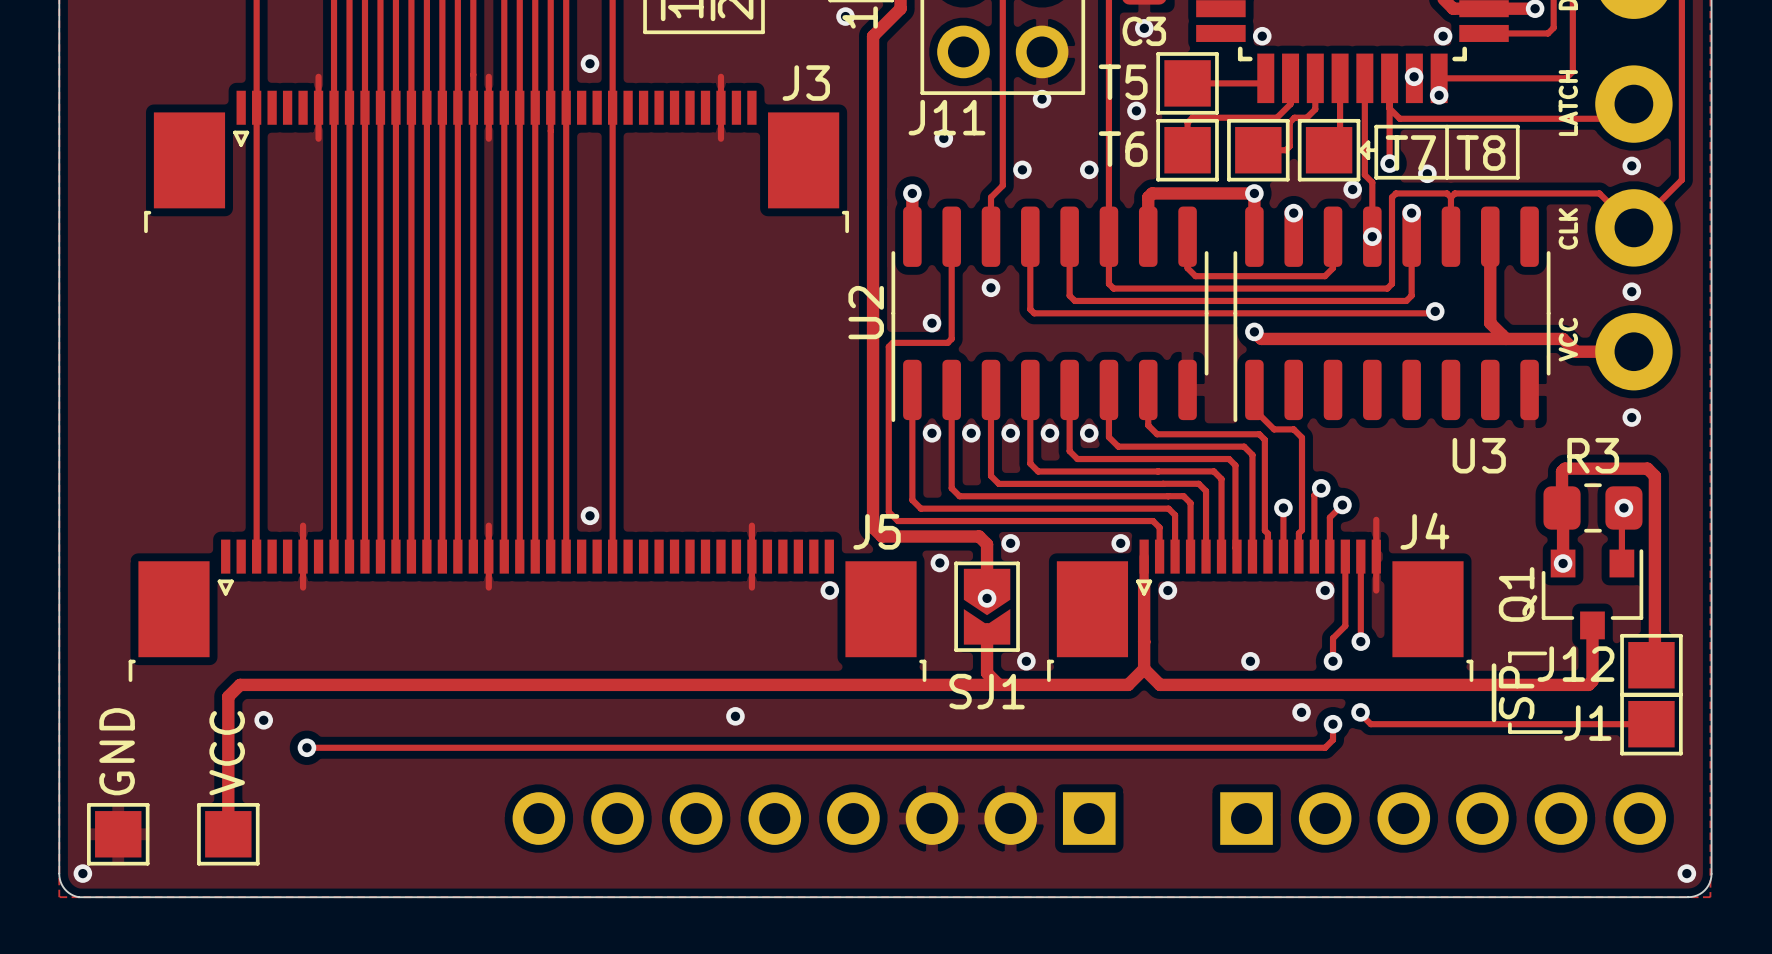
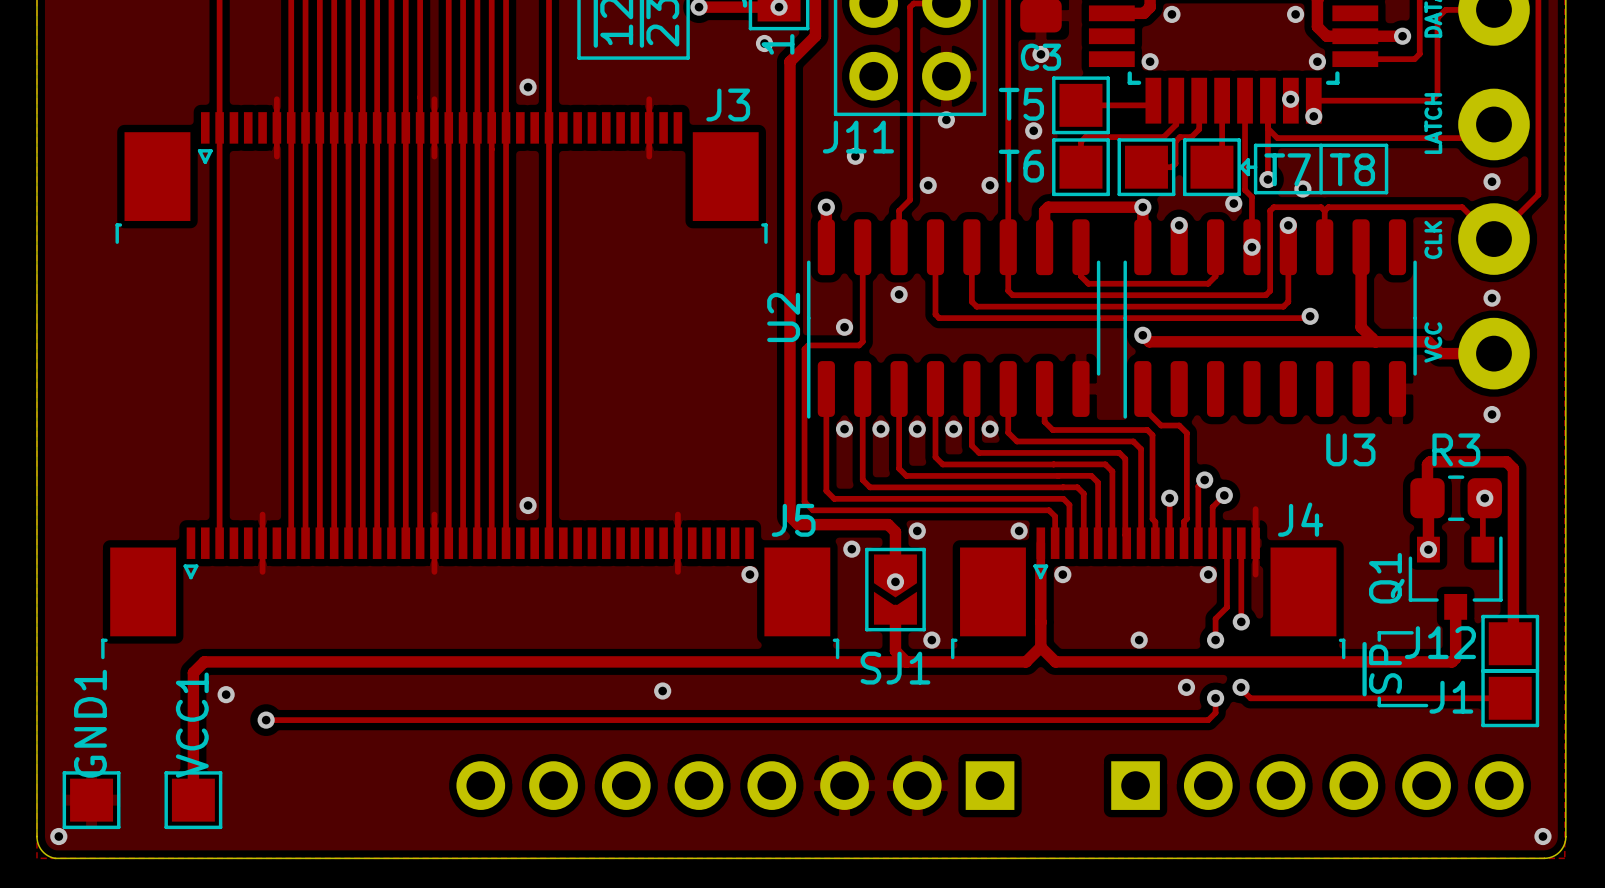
GND name: GND (117, 751) -> GND1 (90, 723)
VCC name: VCC (227, 753) -> VCC1 (192, 725)

